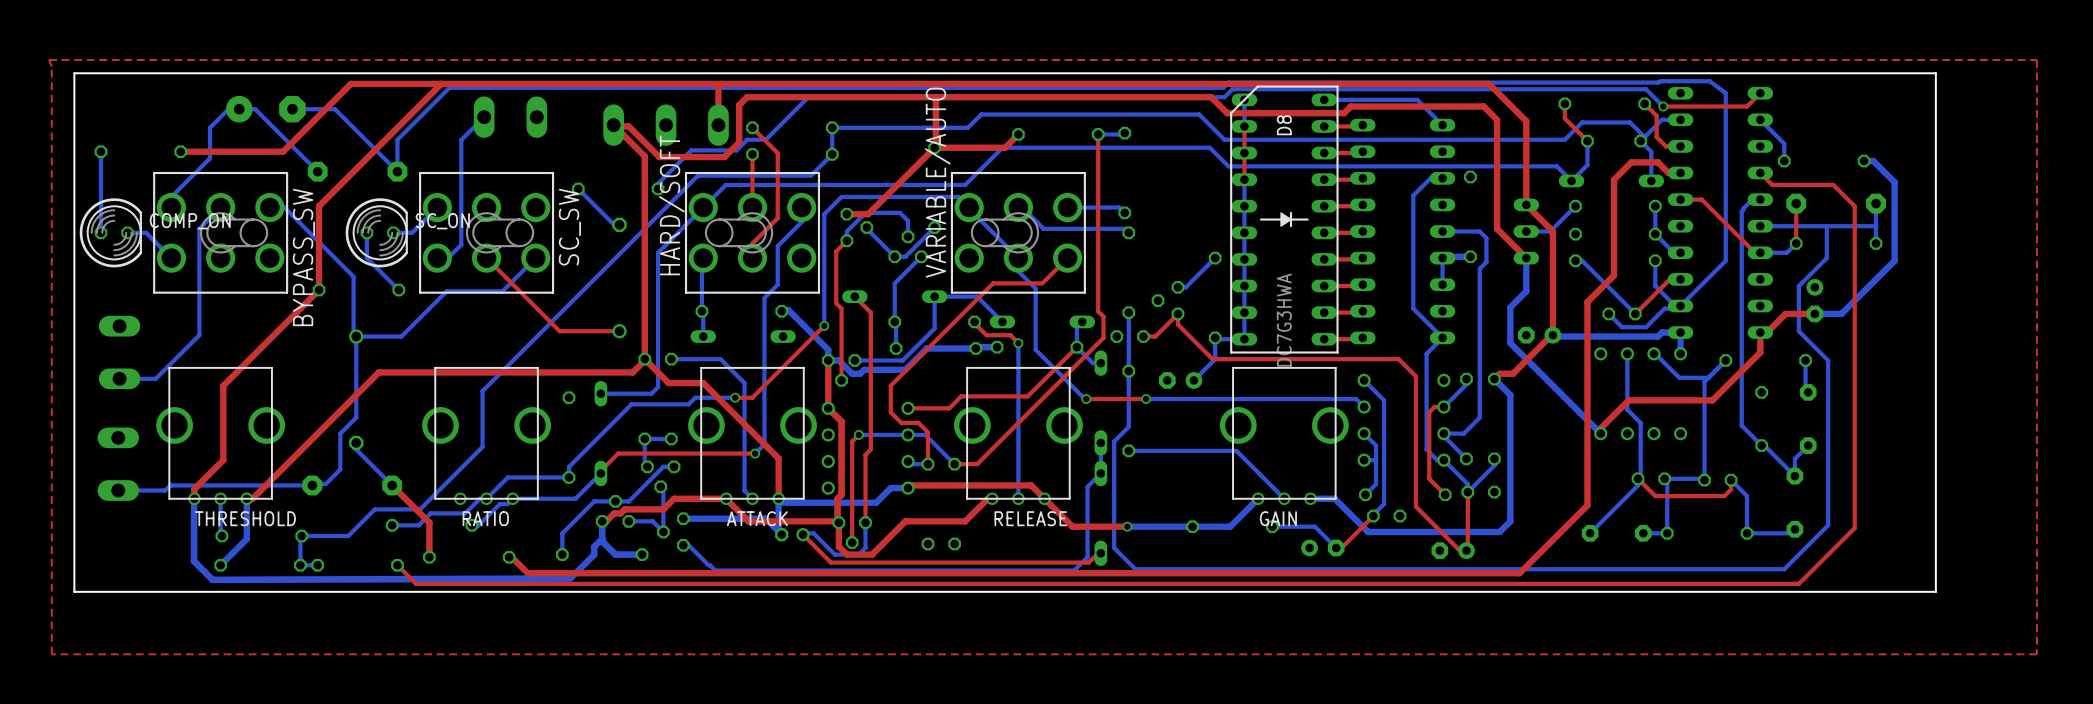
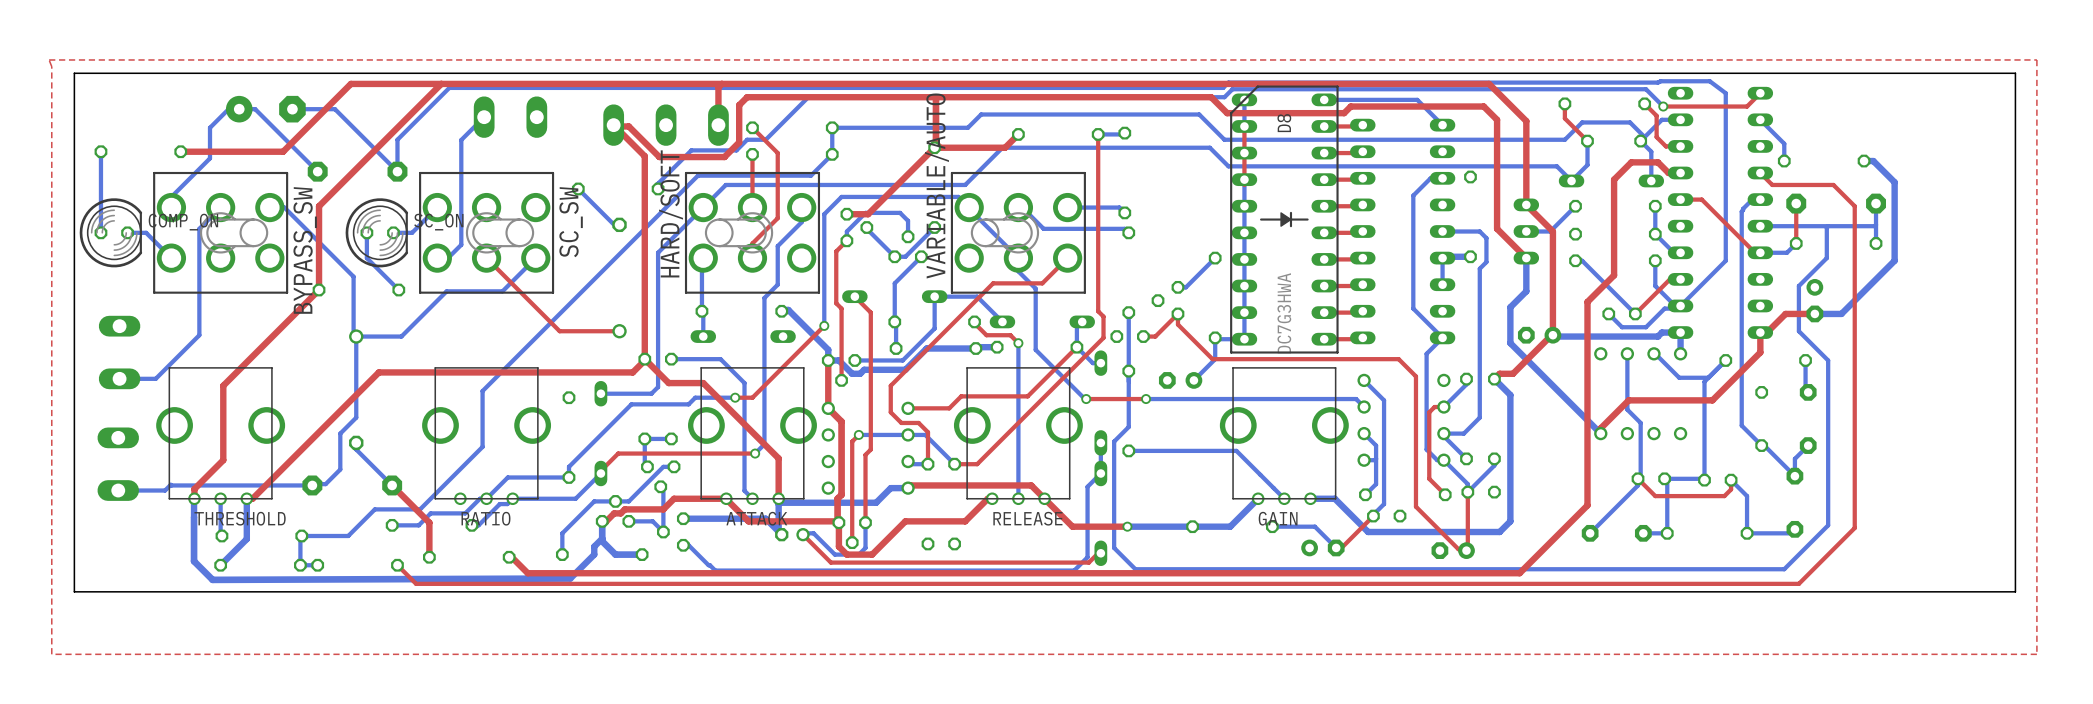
board edge: (1935, 73) (1935, 591) -> (1935, 73) (2015, 73) (2015, 591) (1935, 591)

